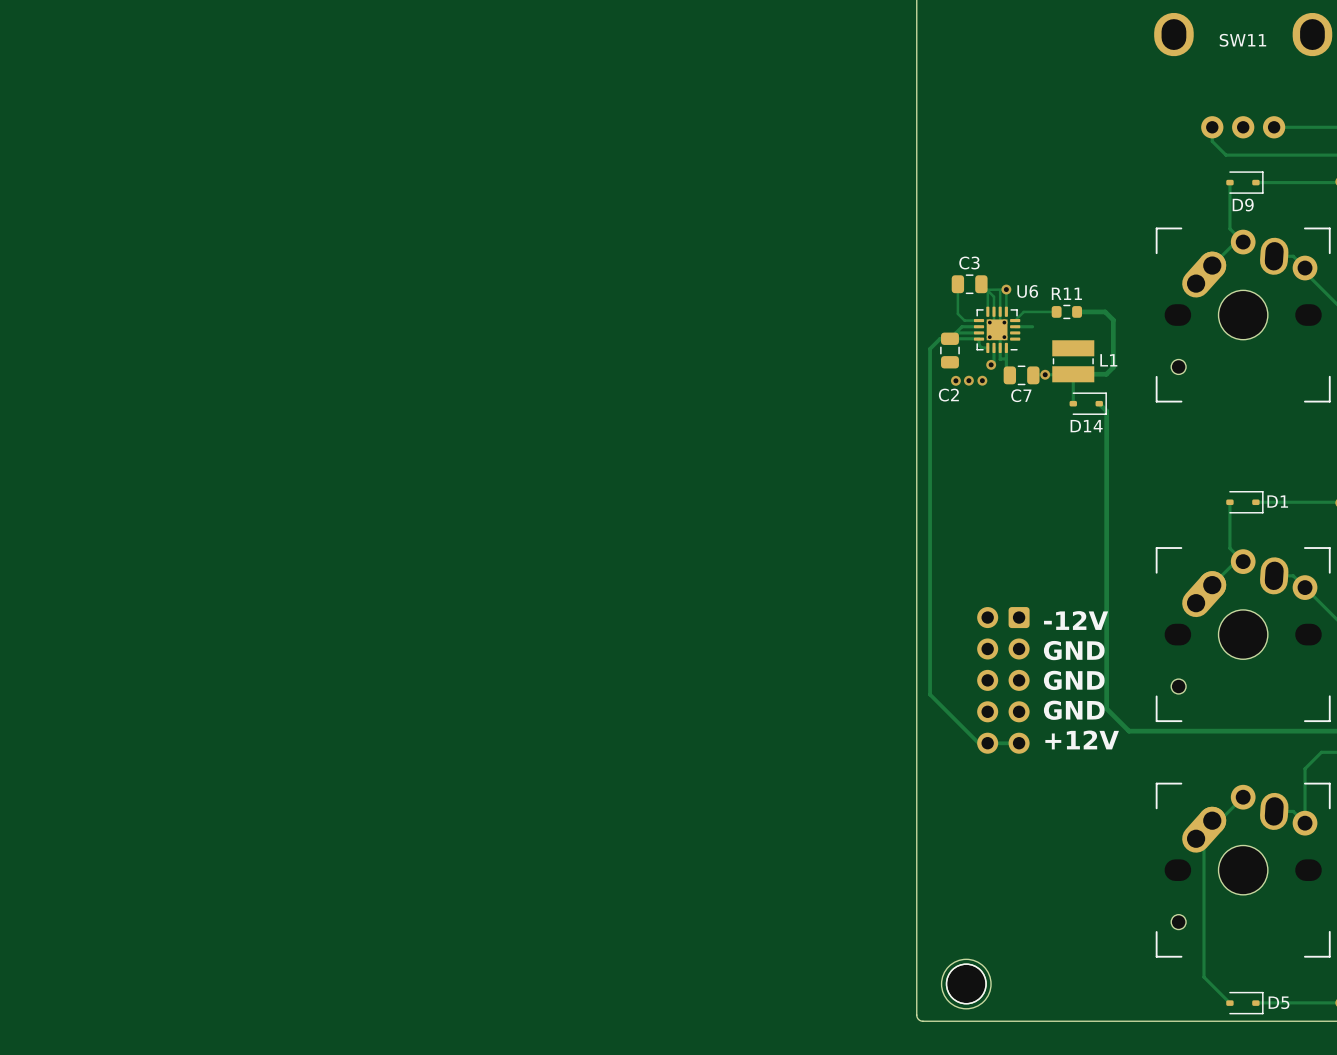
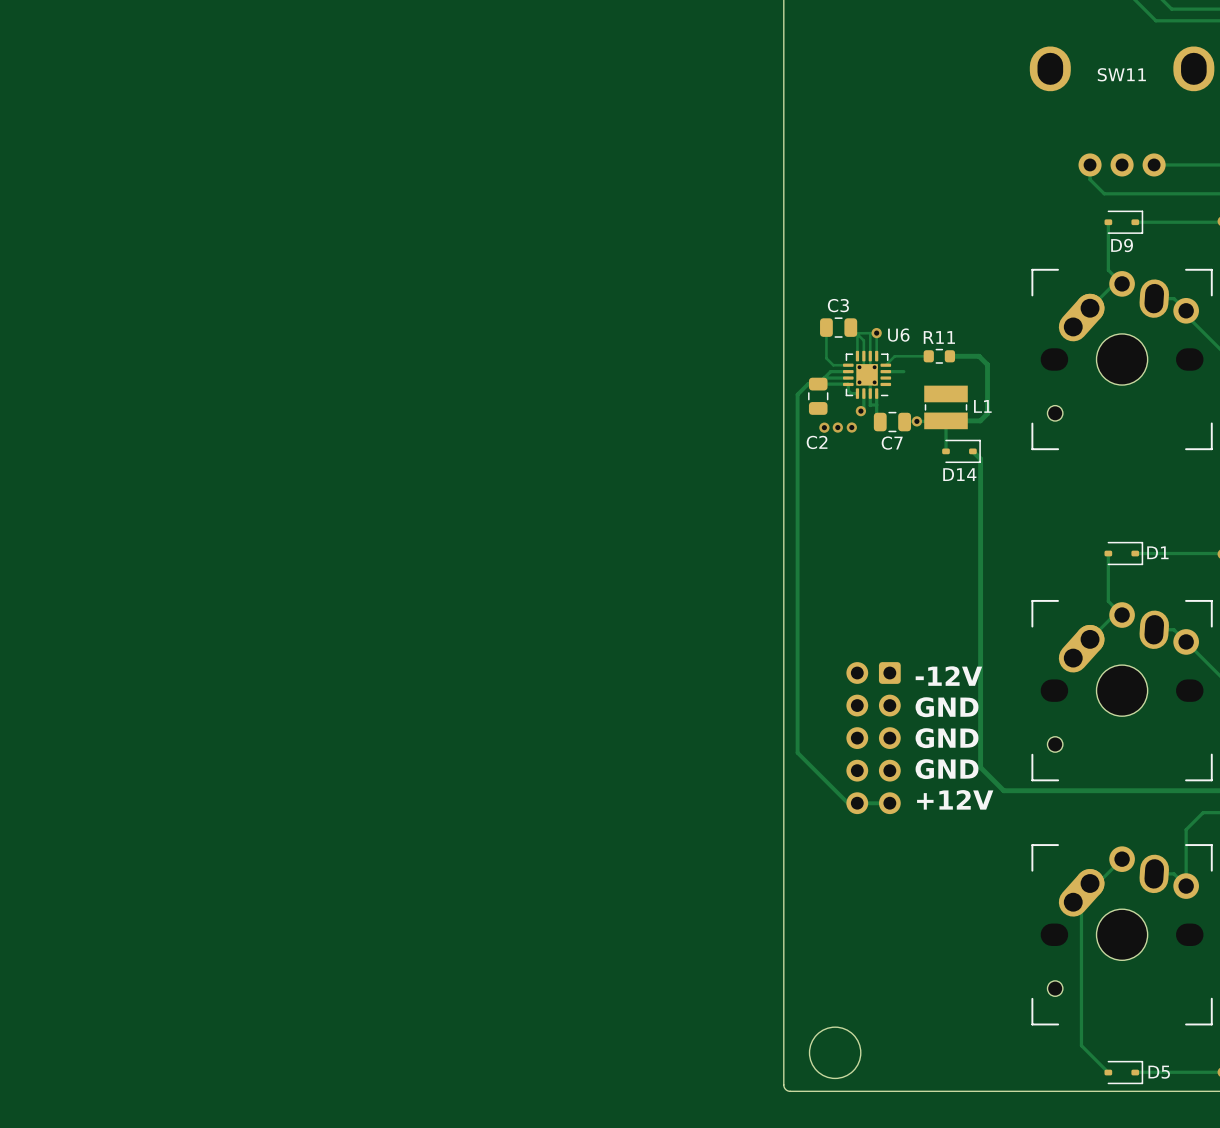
part: (966, 983) -> none

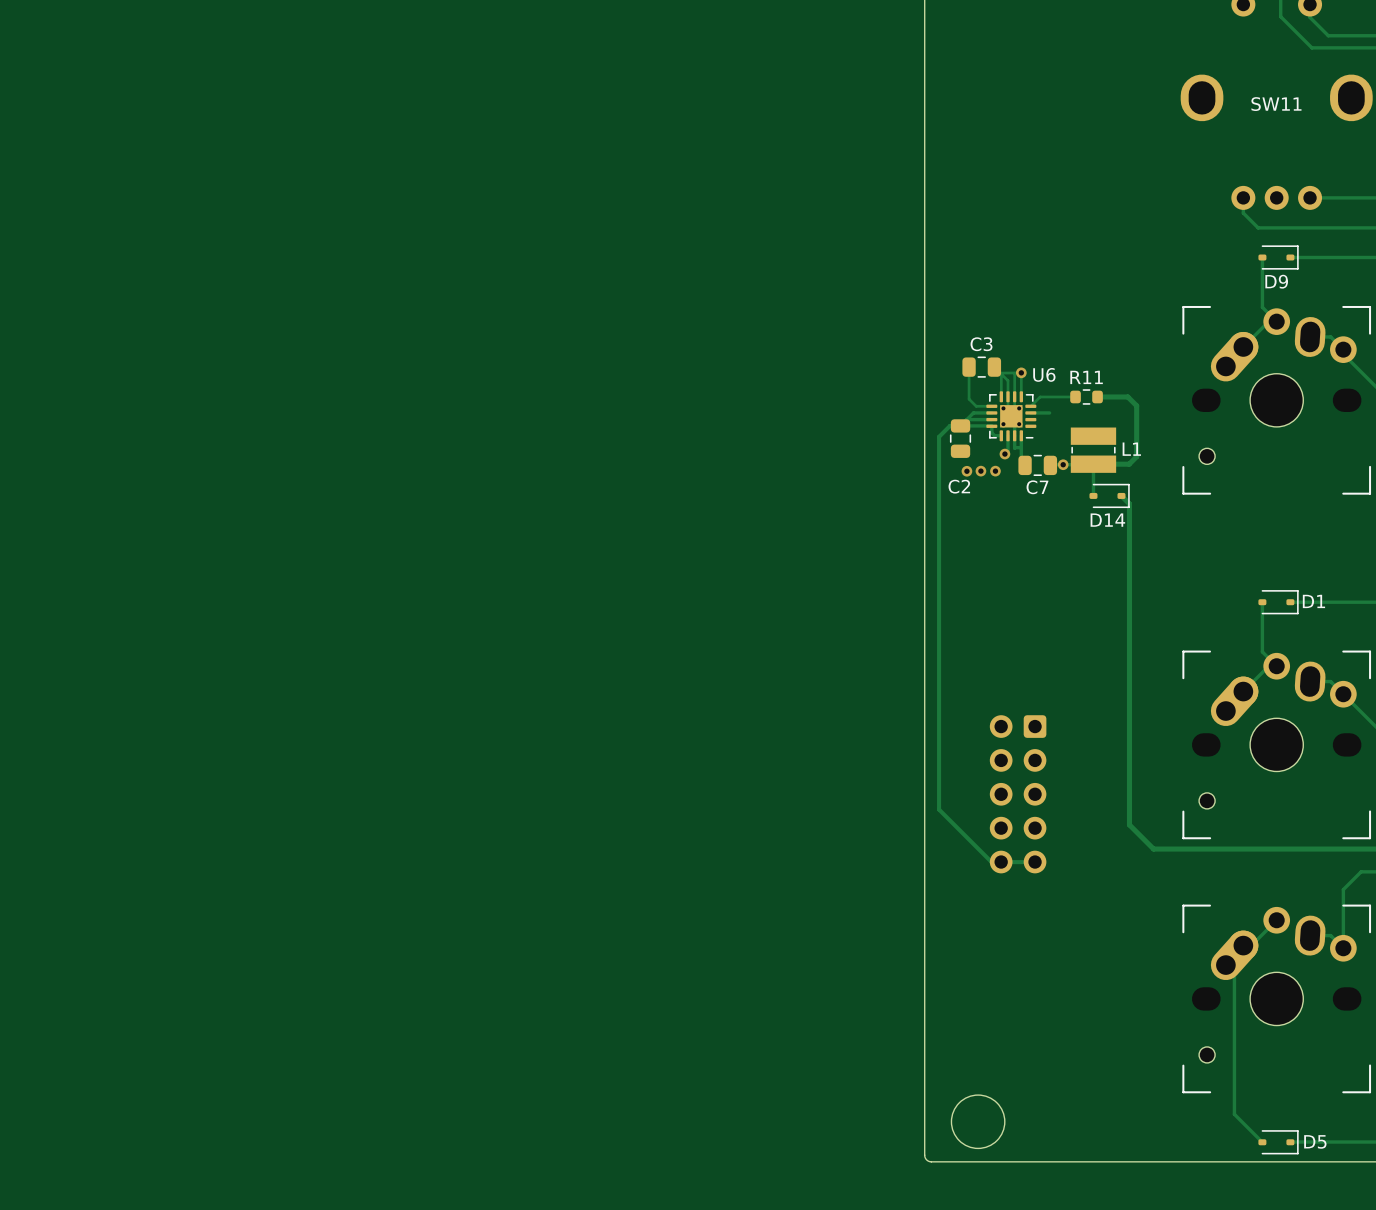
text: -12V (948, 676) -> none
text: GND (947, 707) -> none
text: GND (947, 738) -> none
text: GND (947, 769) -> none
text: +12V (955, 799) -> none

